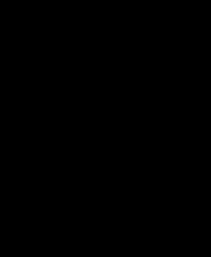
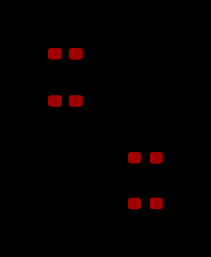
part: none -> (65, 53)
part: none -> (65, 100)
part: none -> (145, 157)
part: none -> (145, 203)

